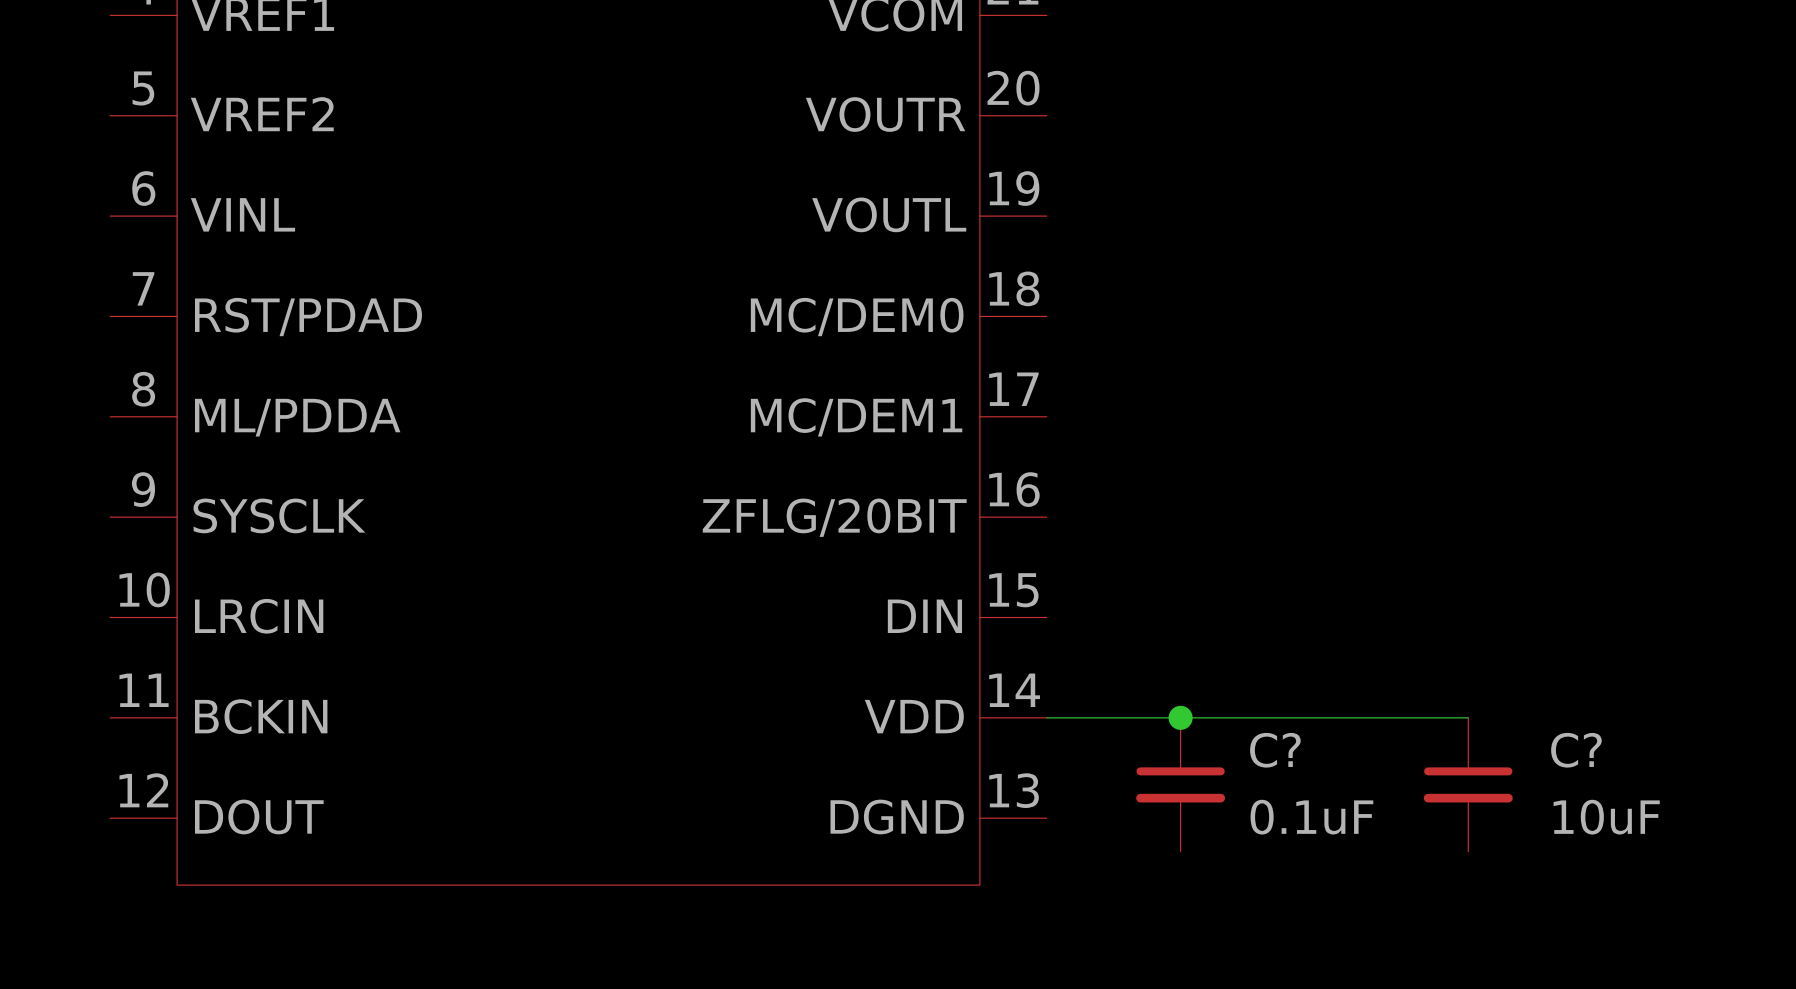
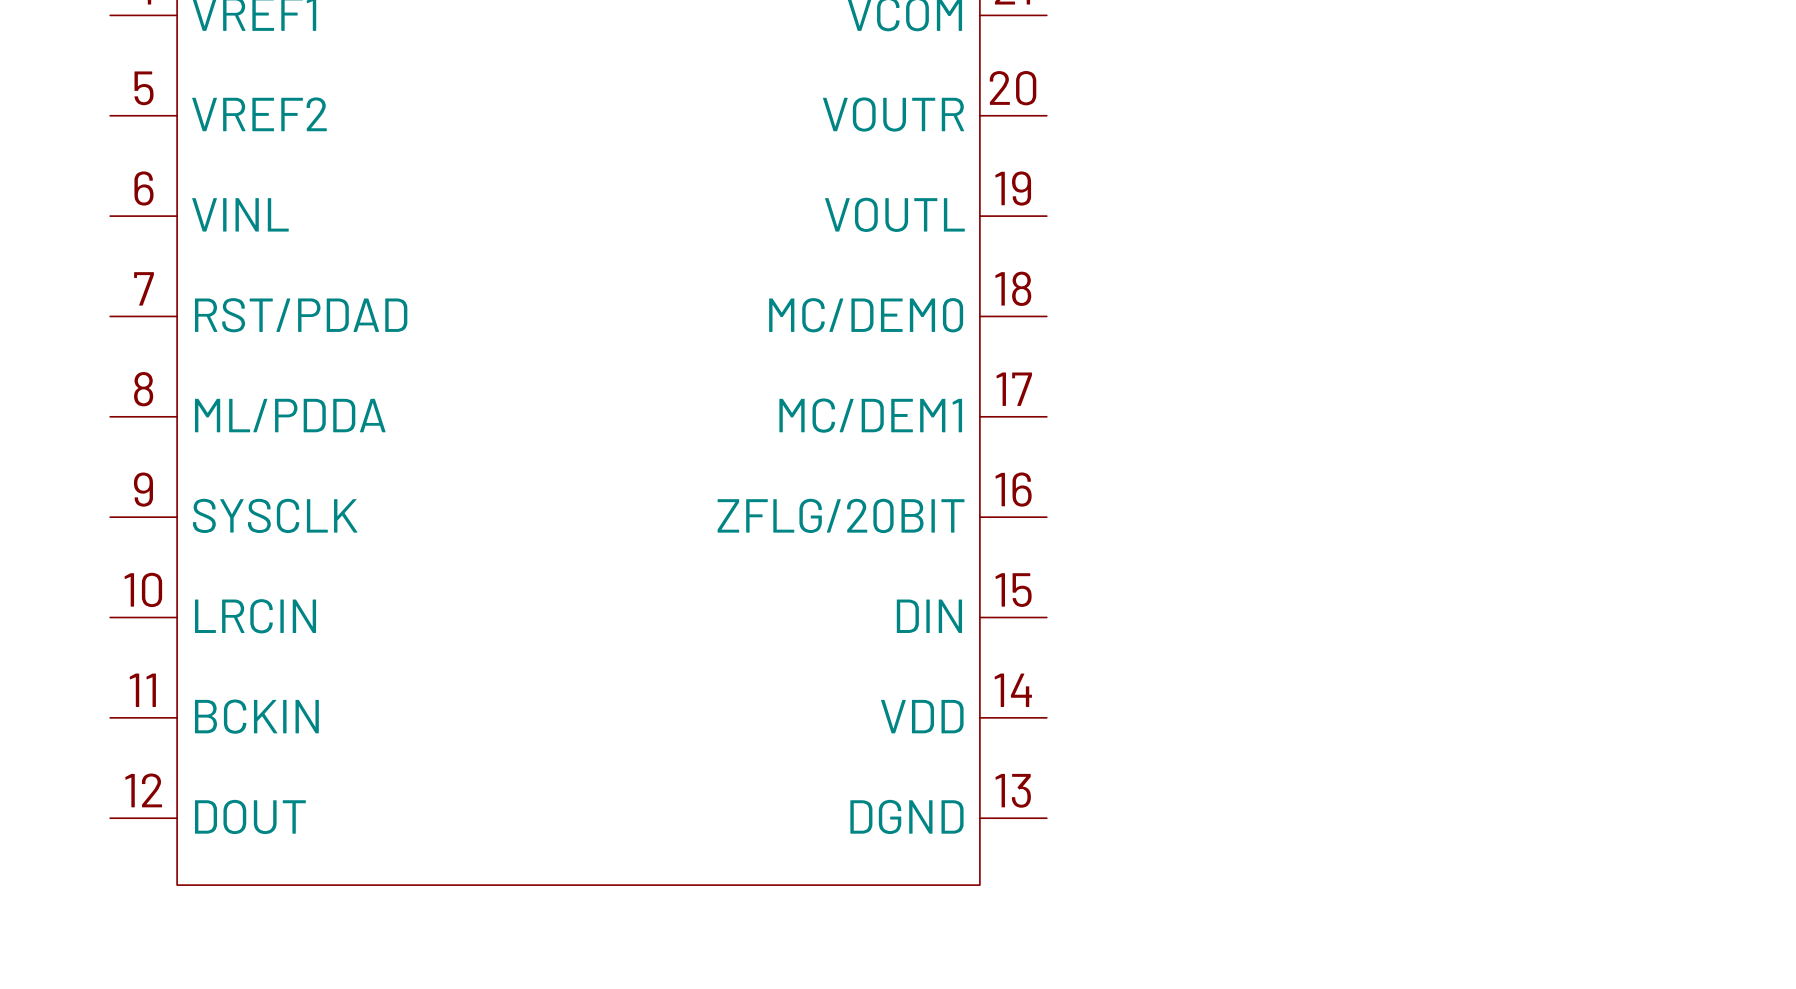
wire: (1046, 717) (1468, 717) -> none
junction: (1180, 717) -> none
C?: 0.1uF (1180, 784) -> none
C?: 10uF (1468, 784) -> none

